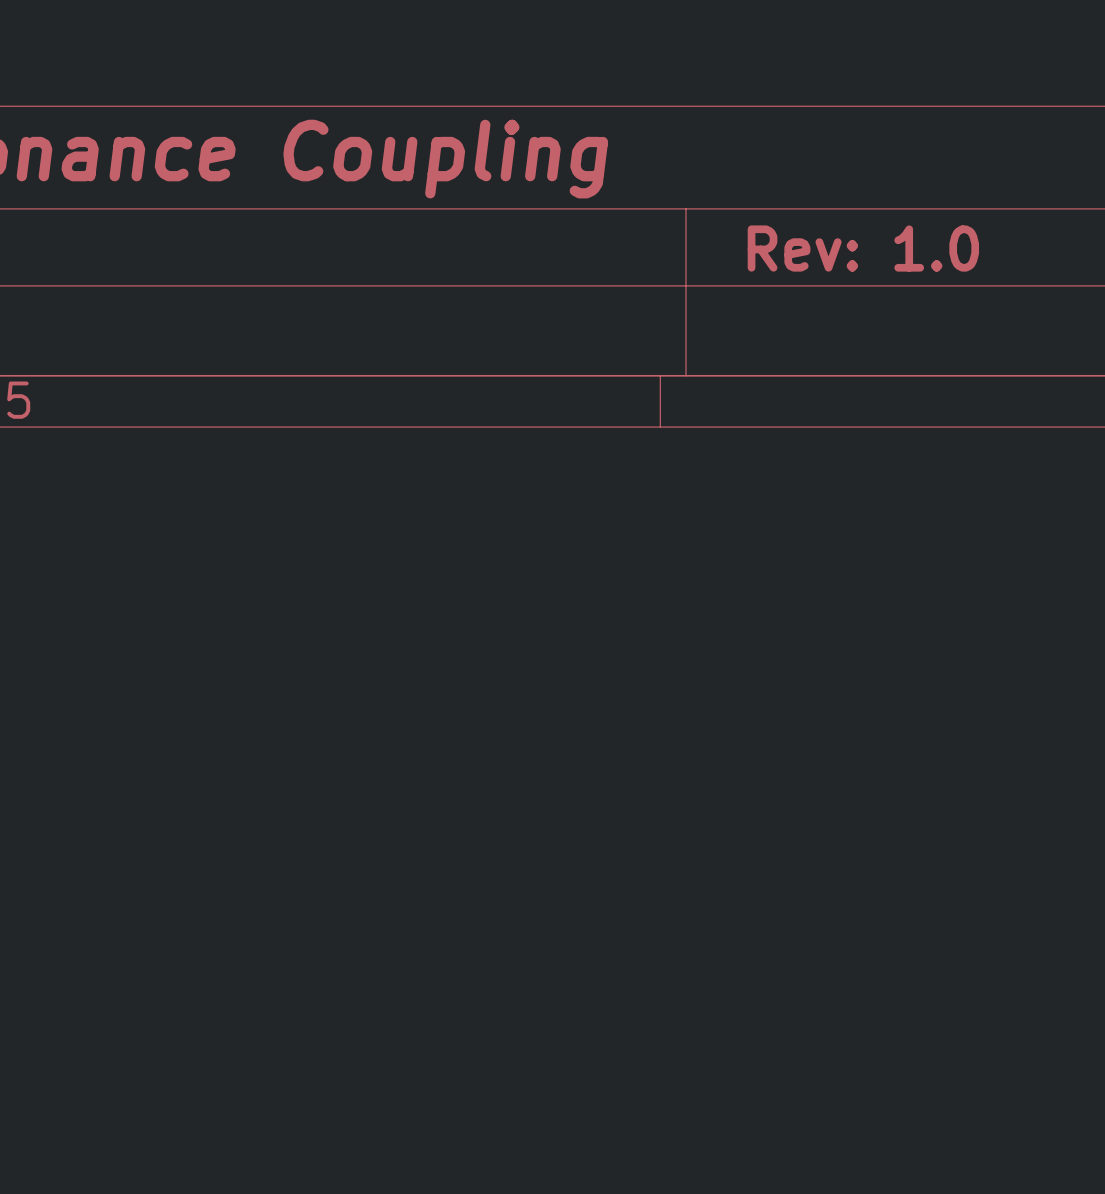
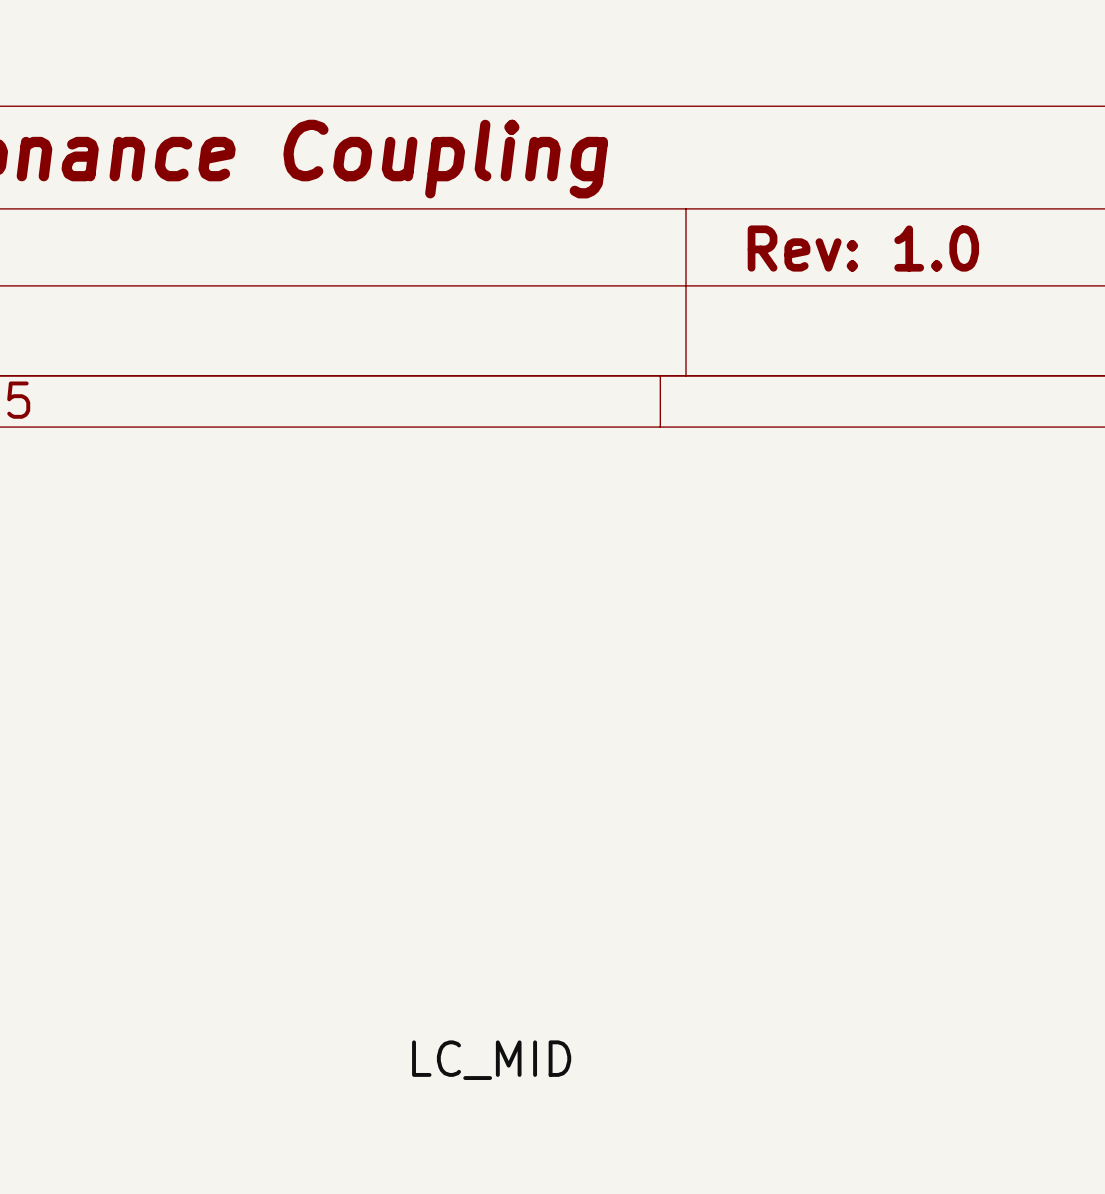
label: none -> LC_MID (491, 1060)

